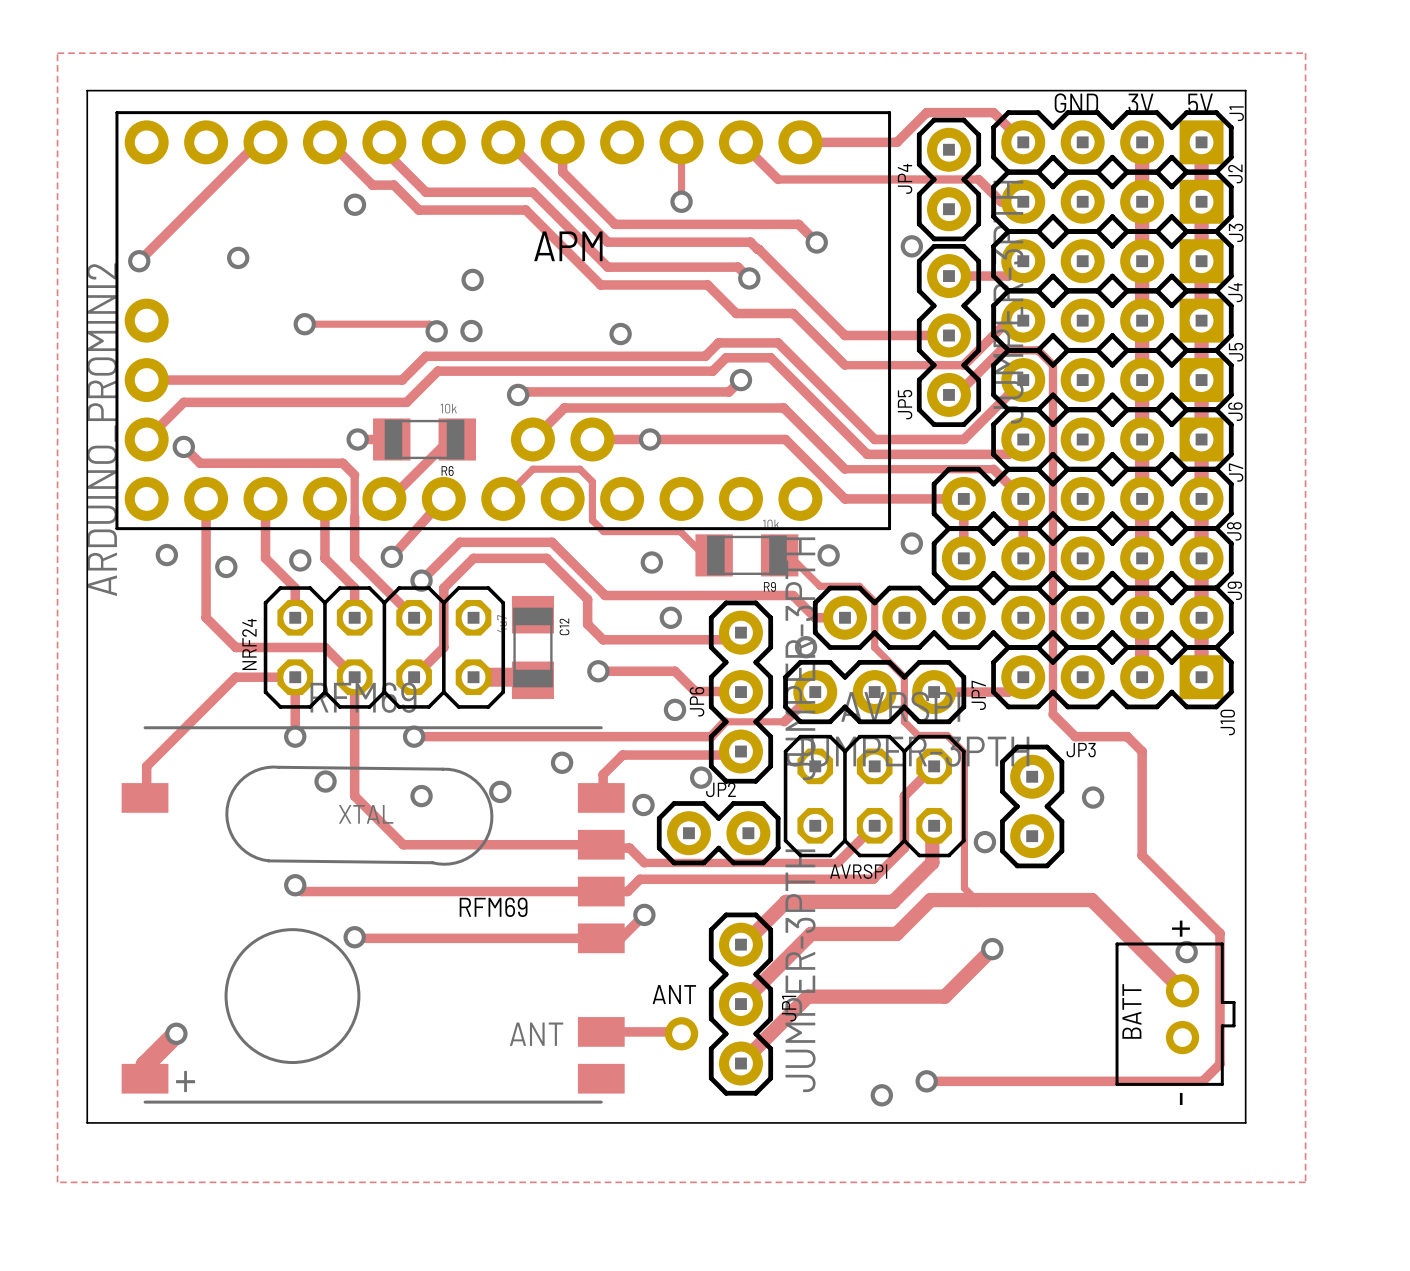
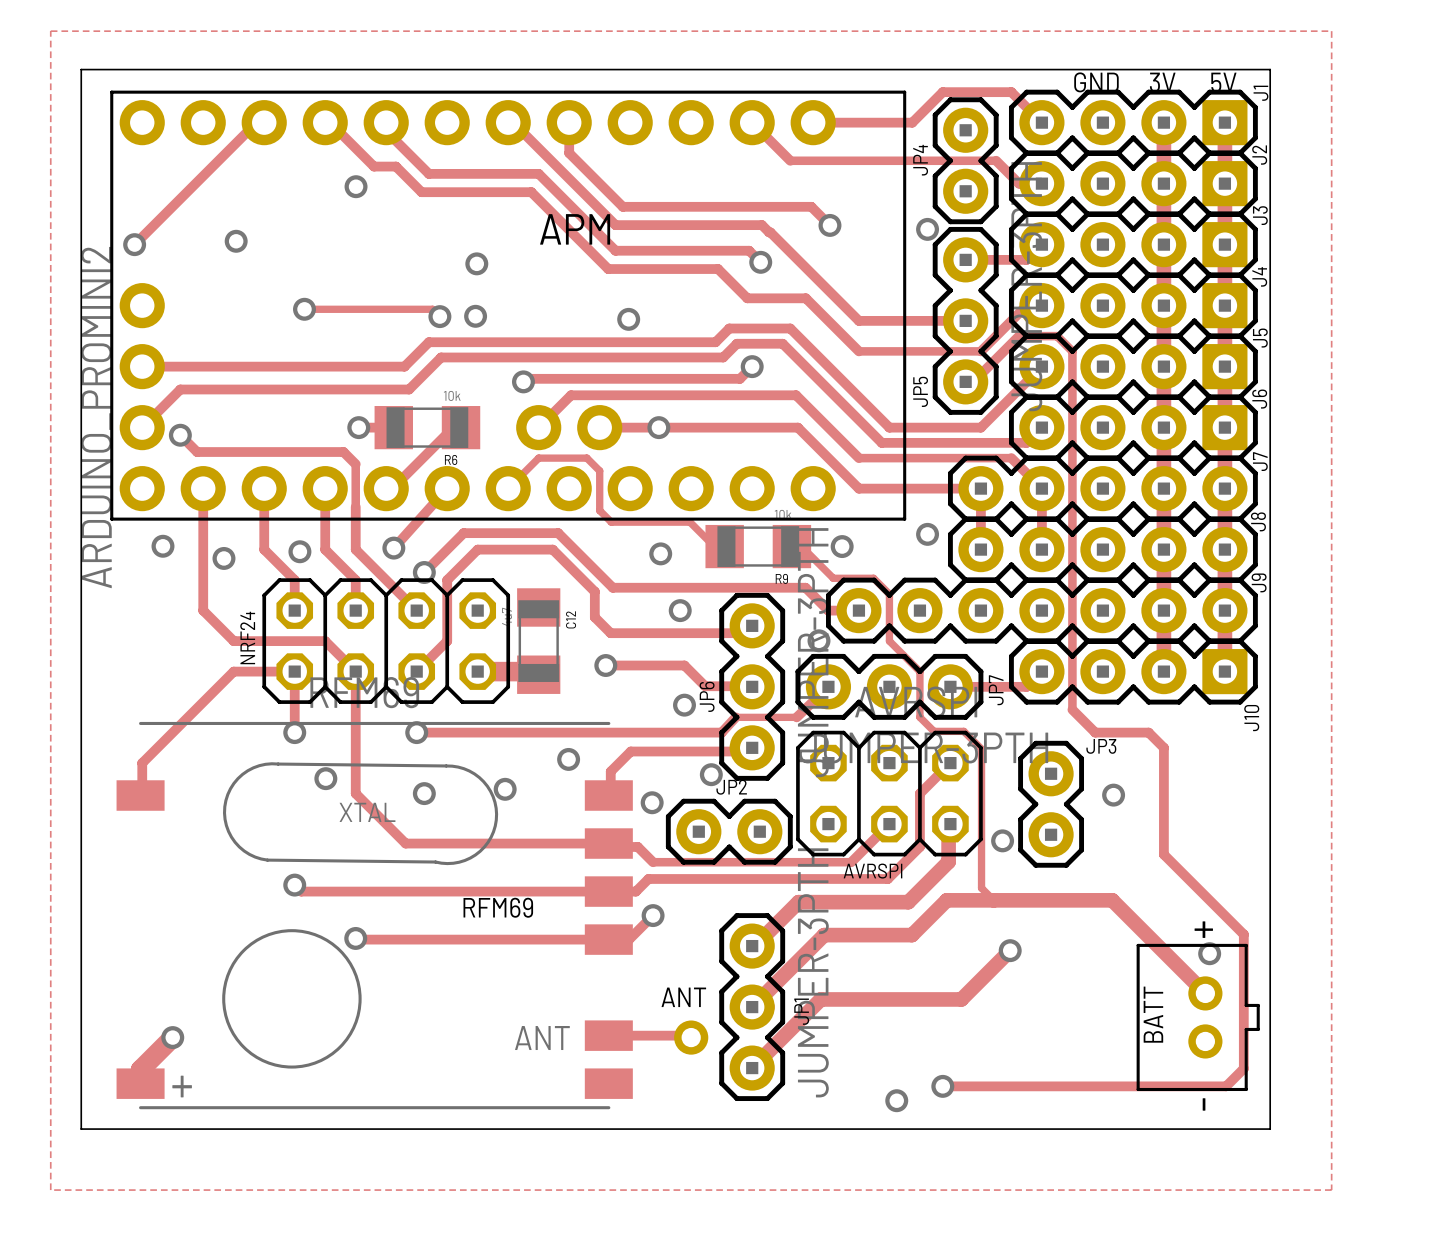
track: (681, 142) (681, 201) -> none
via: (681, 201) -> none

